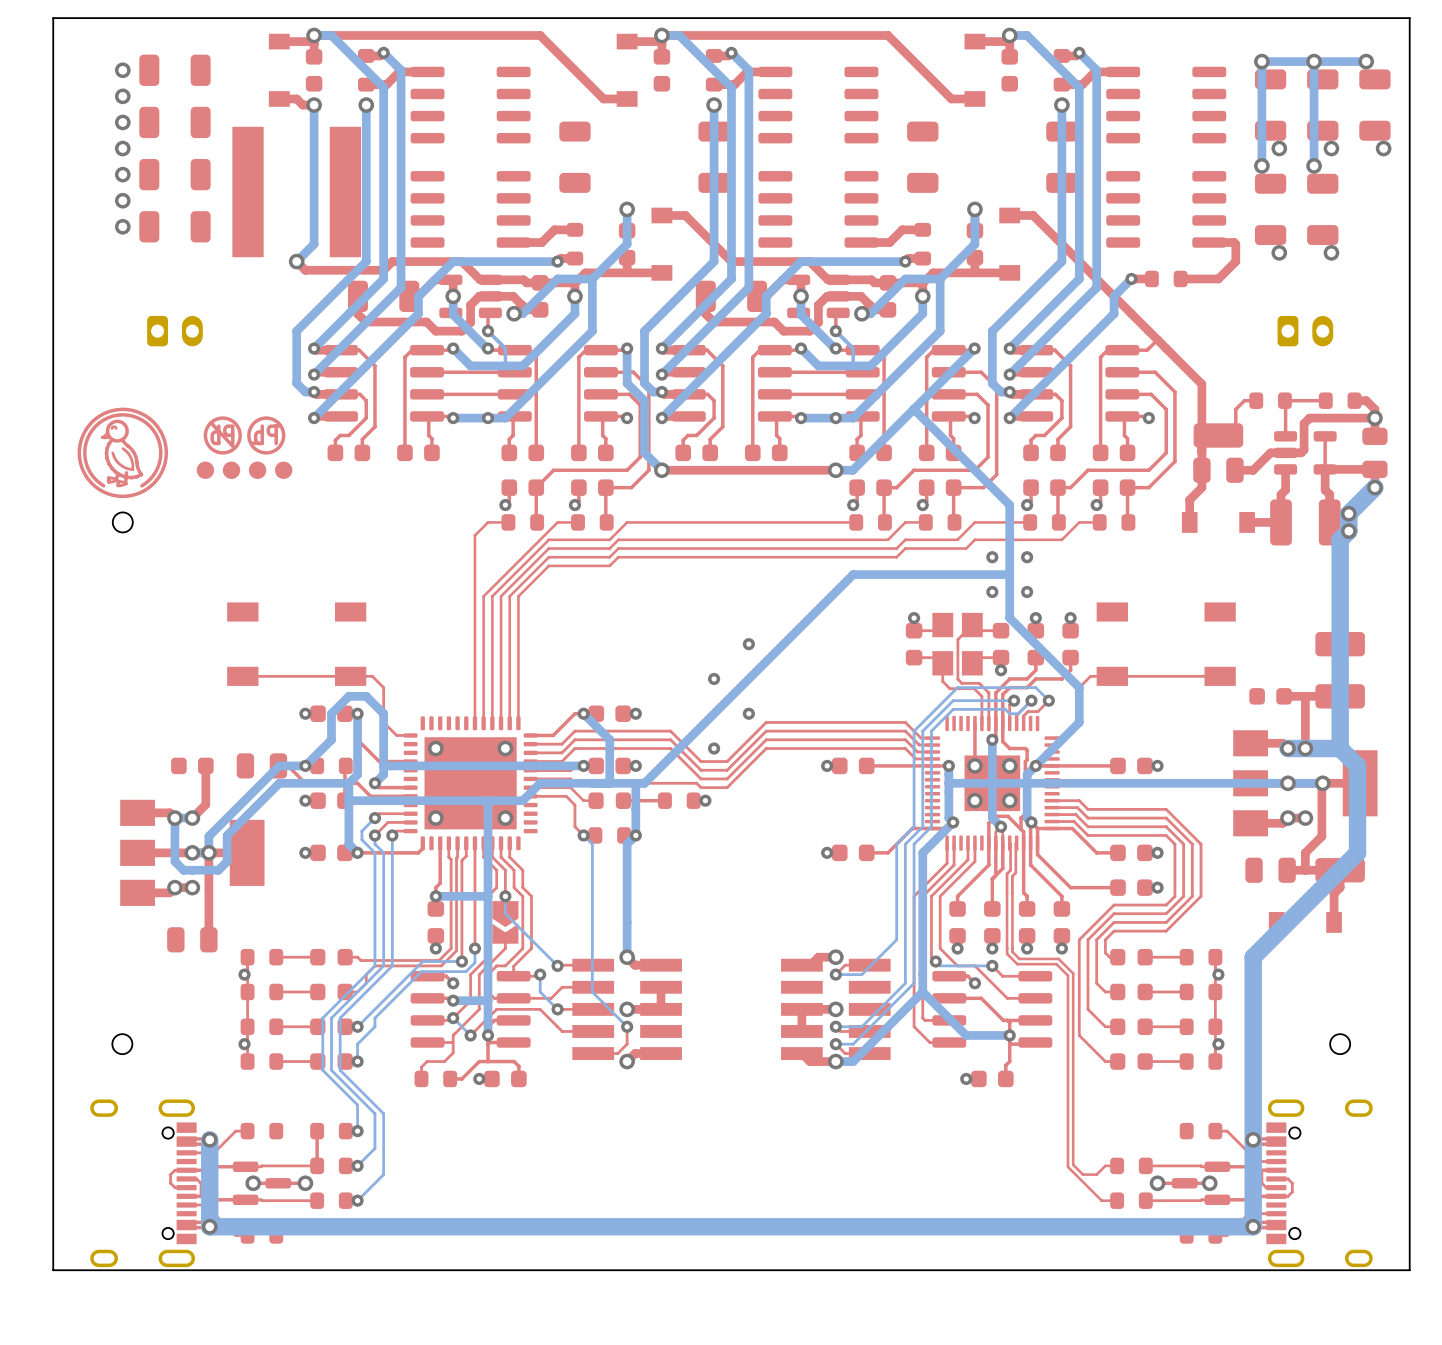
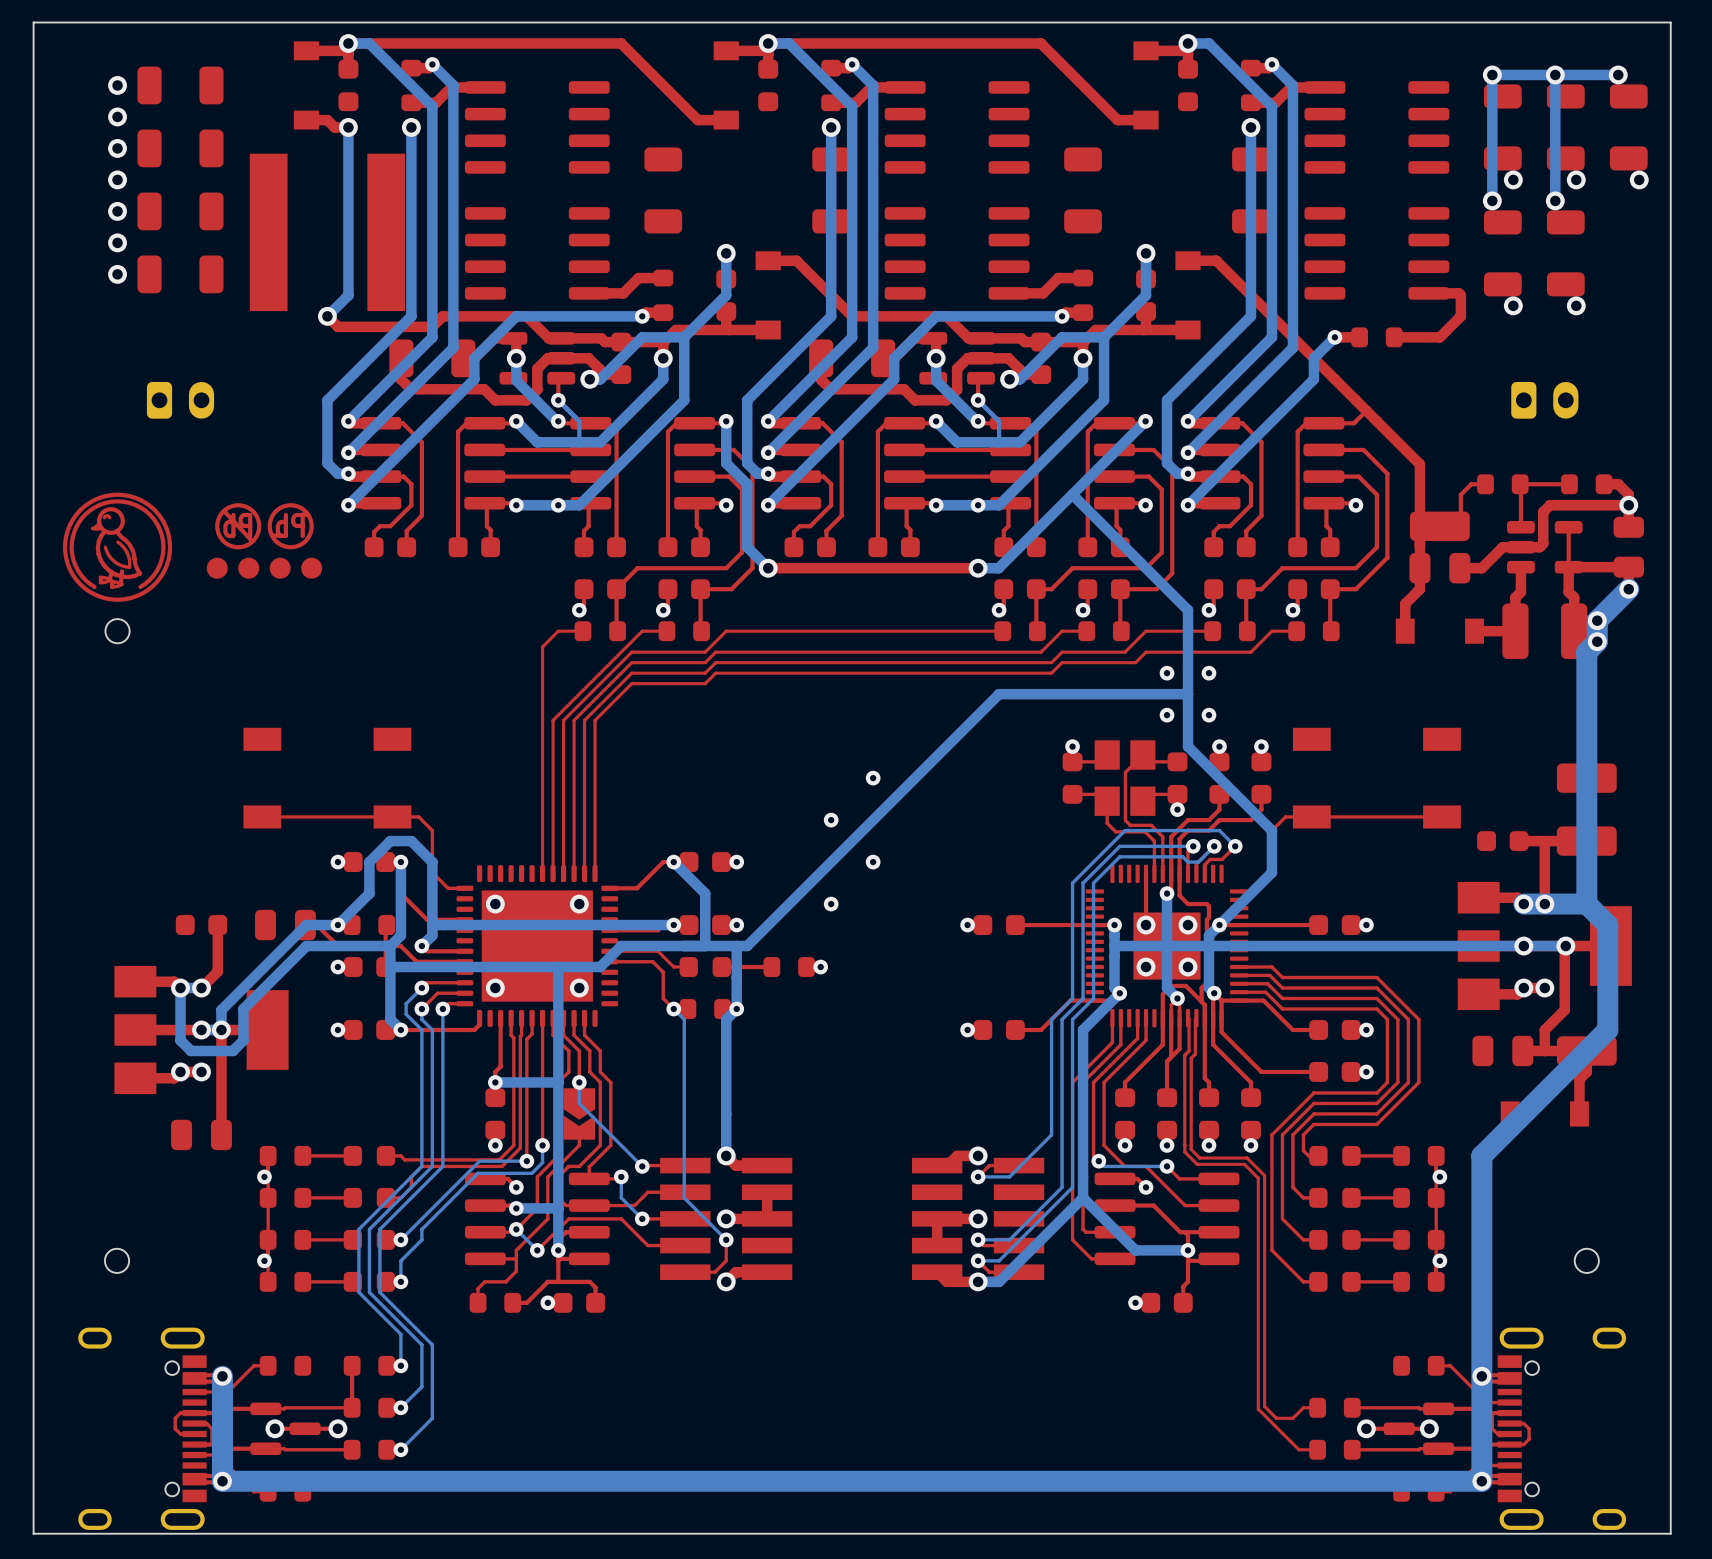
top track: (932, 738) (921, 738) (905, 722) (766, 722) (727, 761) (701, 761) (670, 731) (574, 731) (561, 744) (530, 744) -> none
top track: (932, 745) (919, 745) (905, 731) (766, 731) (727, 770) (701, 770) (670, 739) (574, 739) (561, 752) (530, 752) -> none
top track: (932, 751) (917, 751) (905, 739) (766, 739) (727, 778) (701, 778) (670, 748) (574, 748) (561, 761) (530, 761) -> none
top track: (932, 758) (915, 758) (905, 748) (766, 748) (727, 787) (701, 787) (696, 783) (574, 783) (570, 778) (530, 778) -> none

